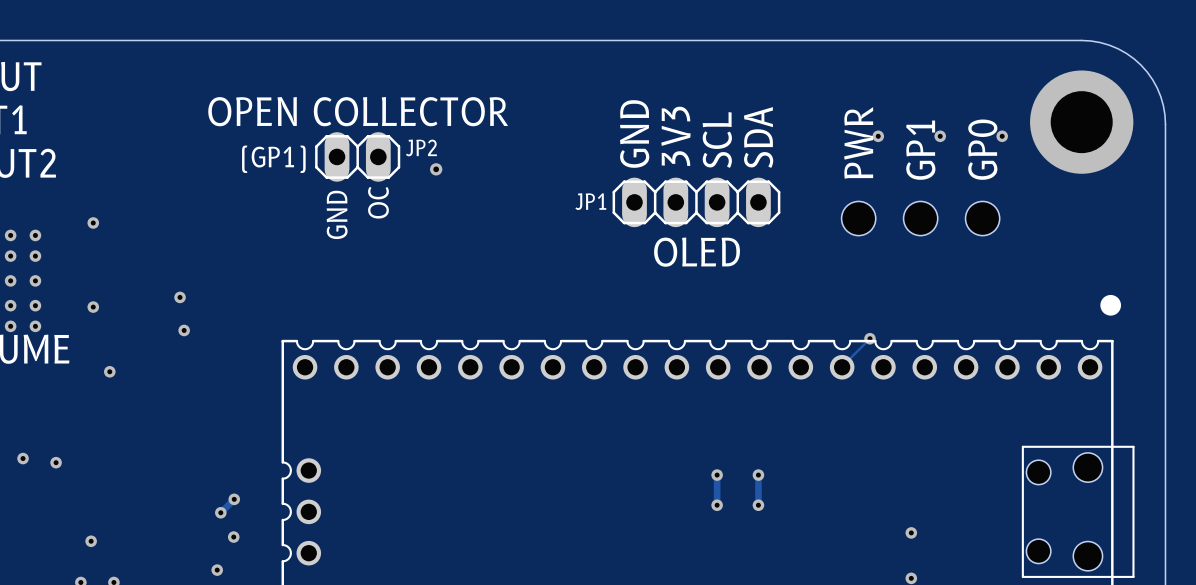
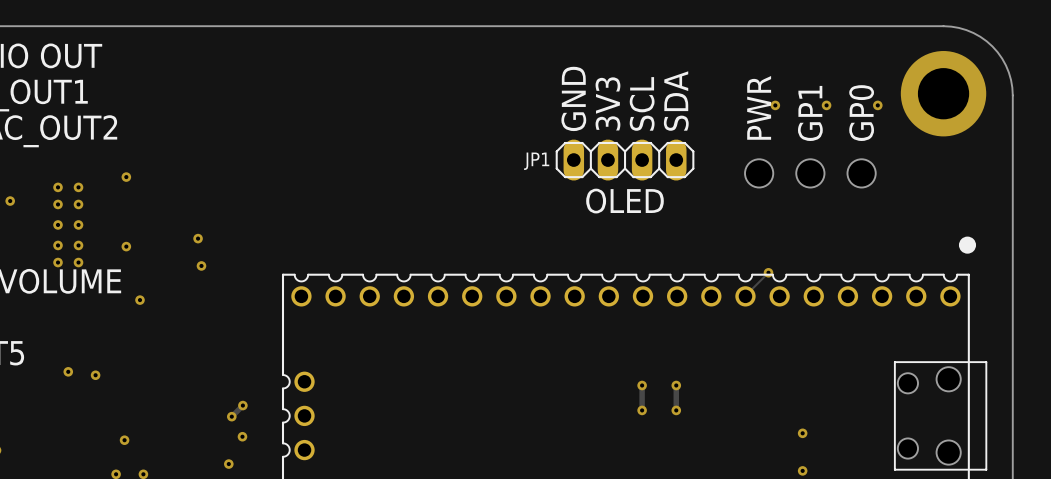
text: OPEN COLLECTOR (358, 111) -> none
JP2: (357, 156) -> none
text: (GP1) (273, 159) -> none
via: (436, 169) -> none
text: OC (378, 202) -> none
text: GND (337, 214) -> none

